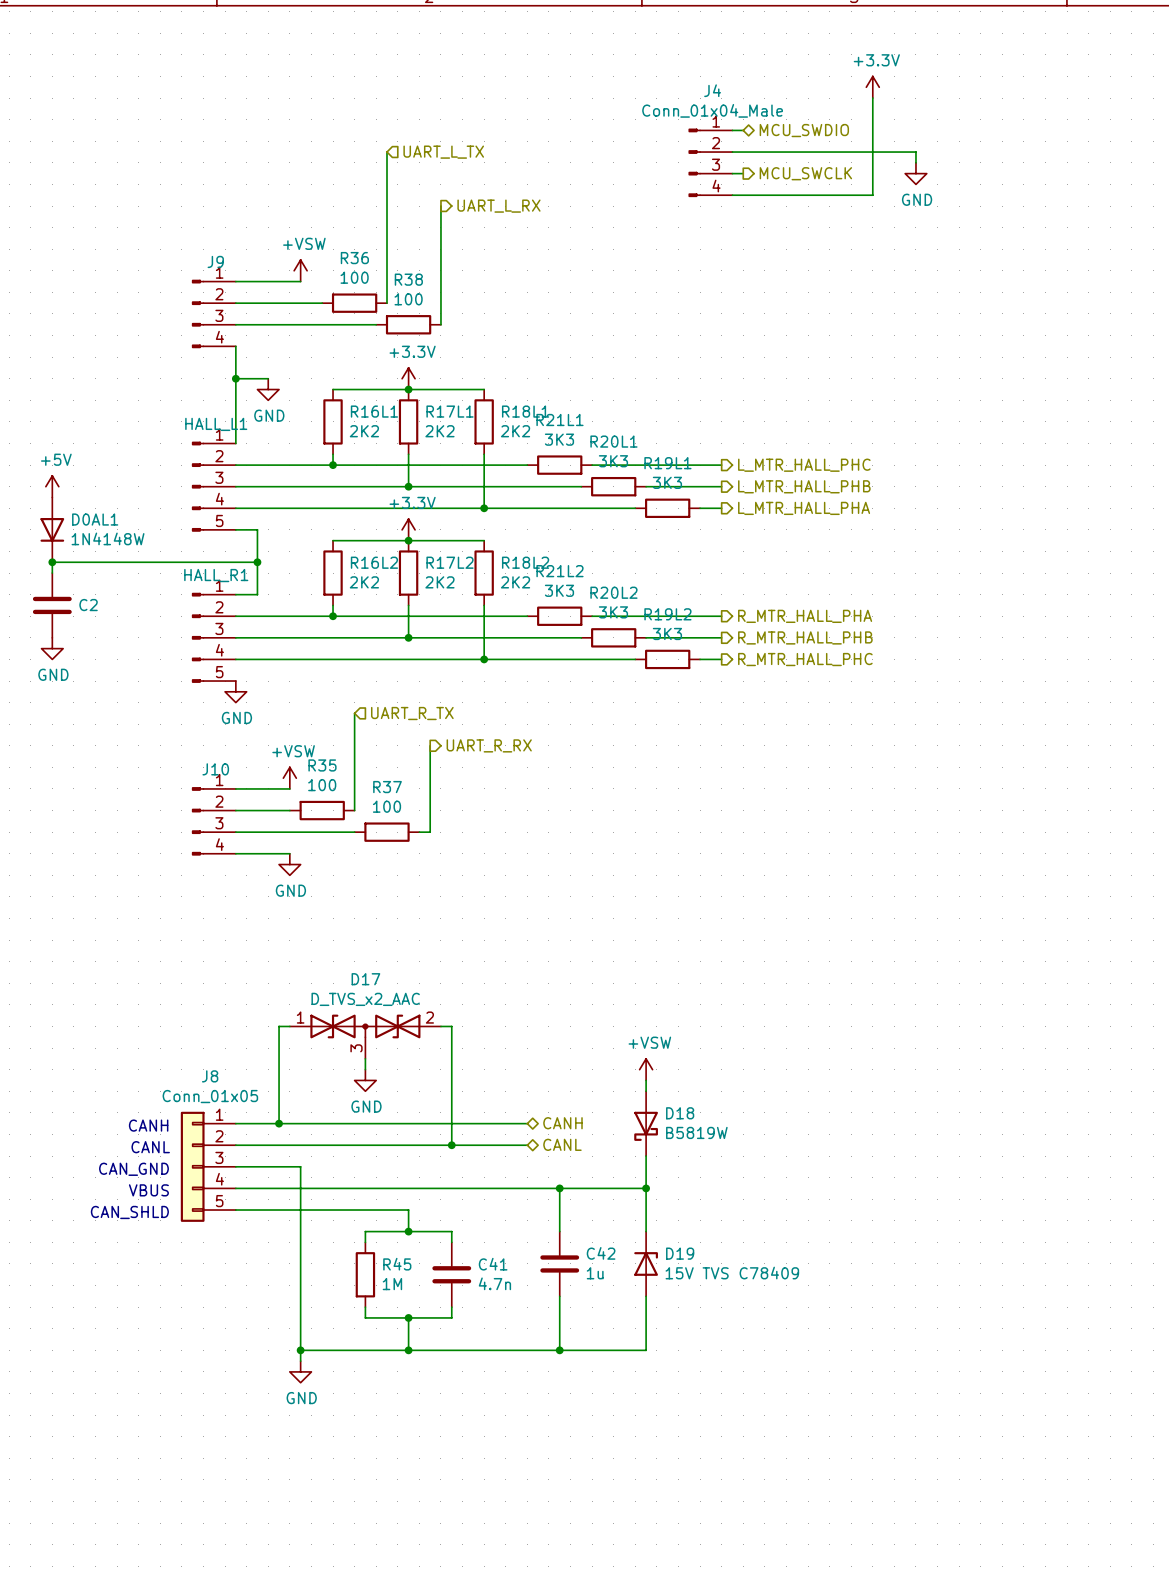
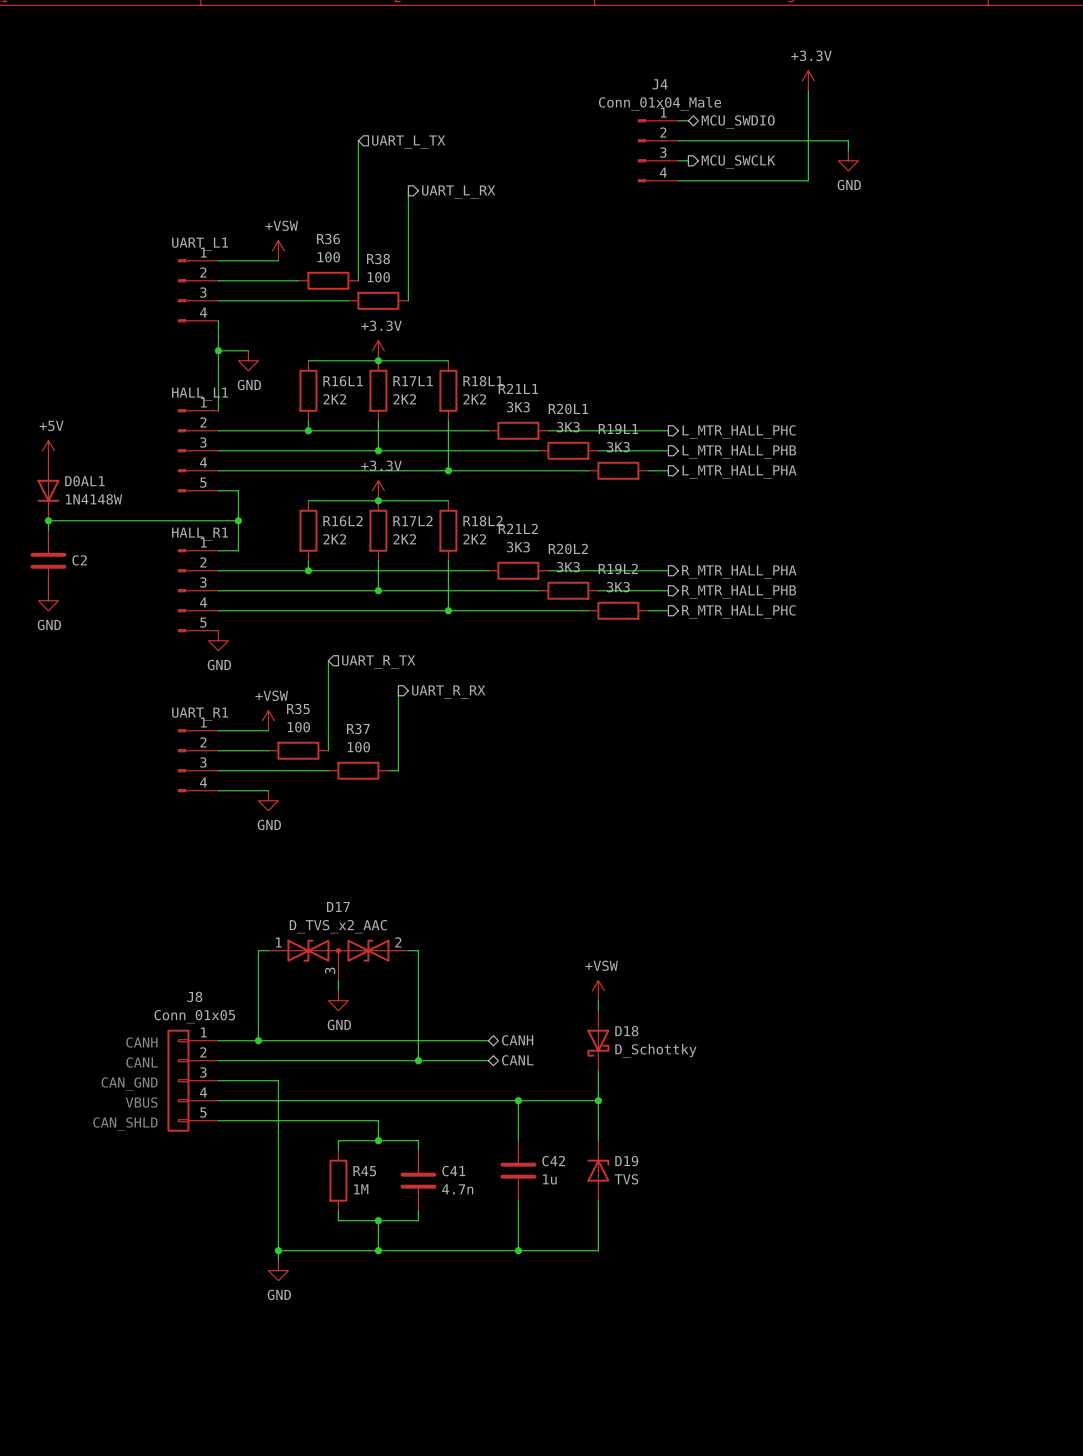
J9 name: J9 (215, 261) -> UART_L1 (200, 244)
J10 name: J10 (215, 769) -> UART_R1 (200, 714)
D18 value: B5819W (696, 1132) -> D_Schottky (655, 1050)
D19 value: 15V TVS C78409 (732, 1273) -> TVS (626, 1179)

